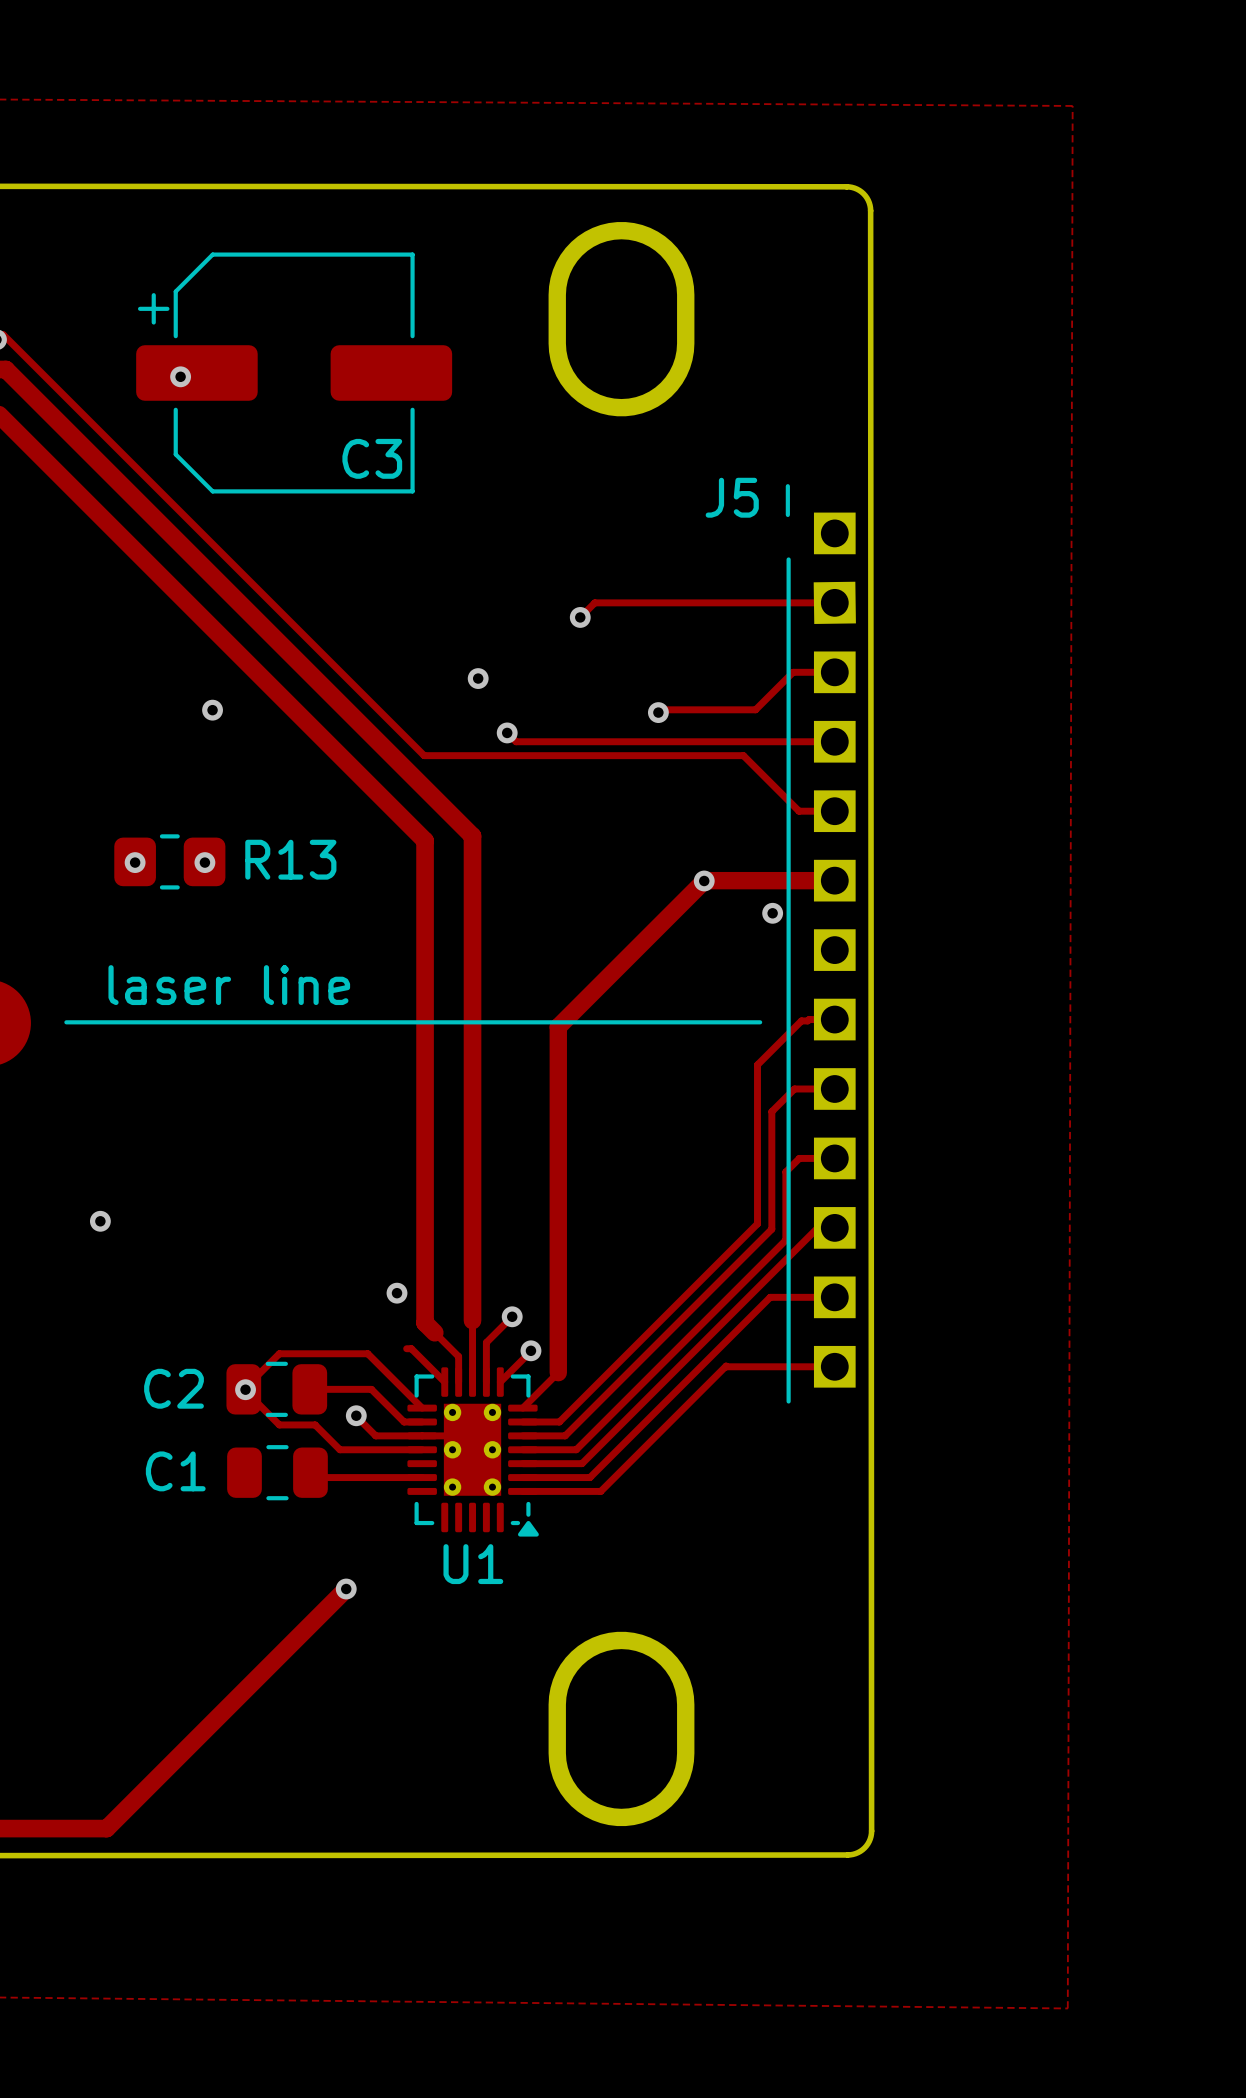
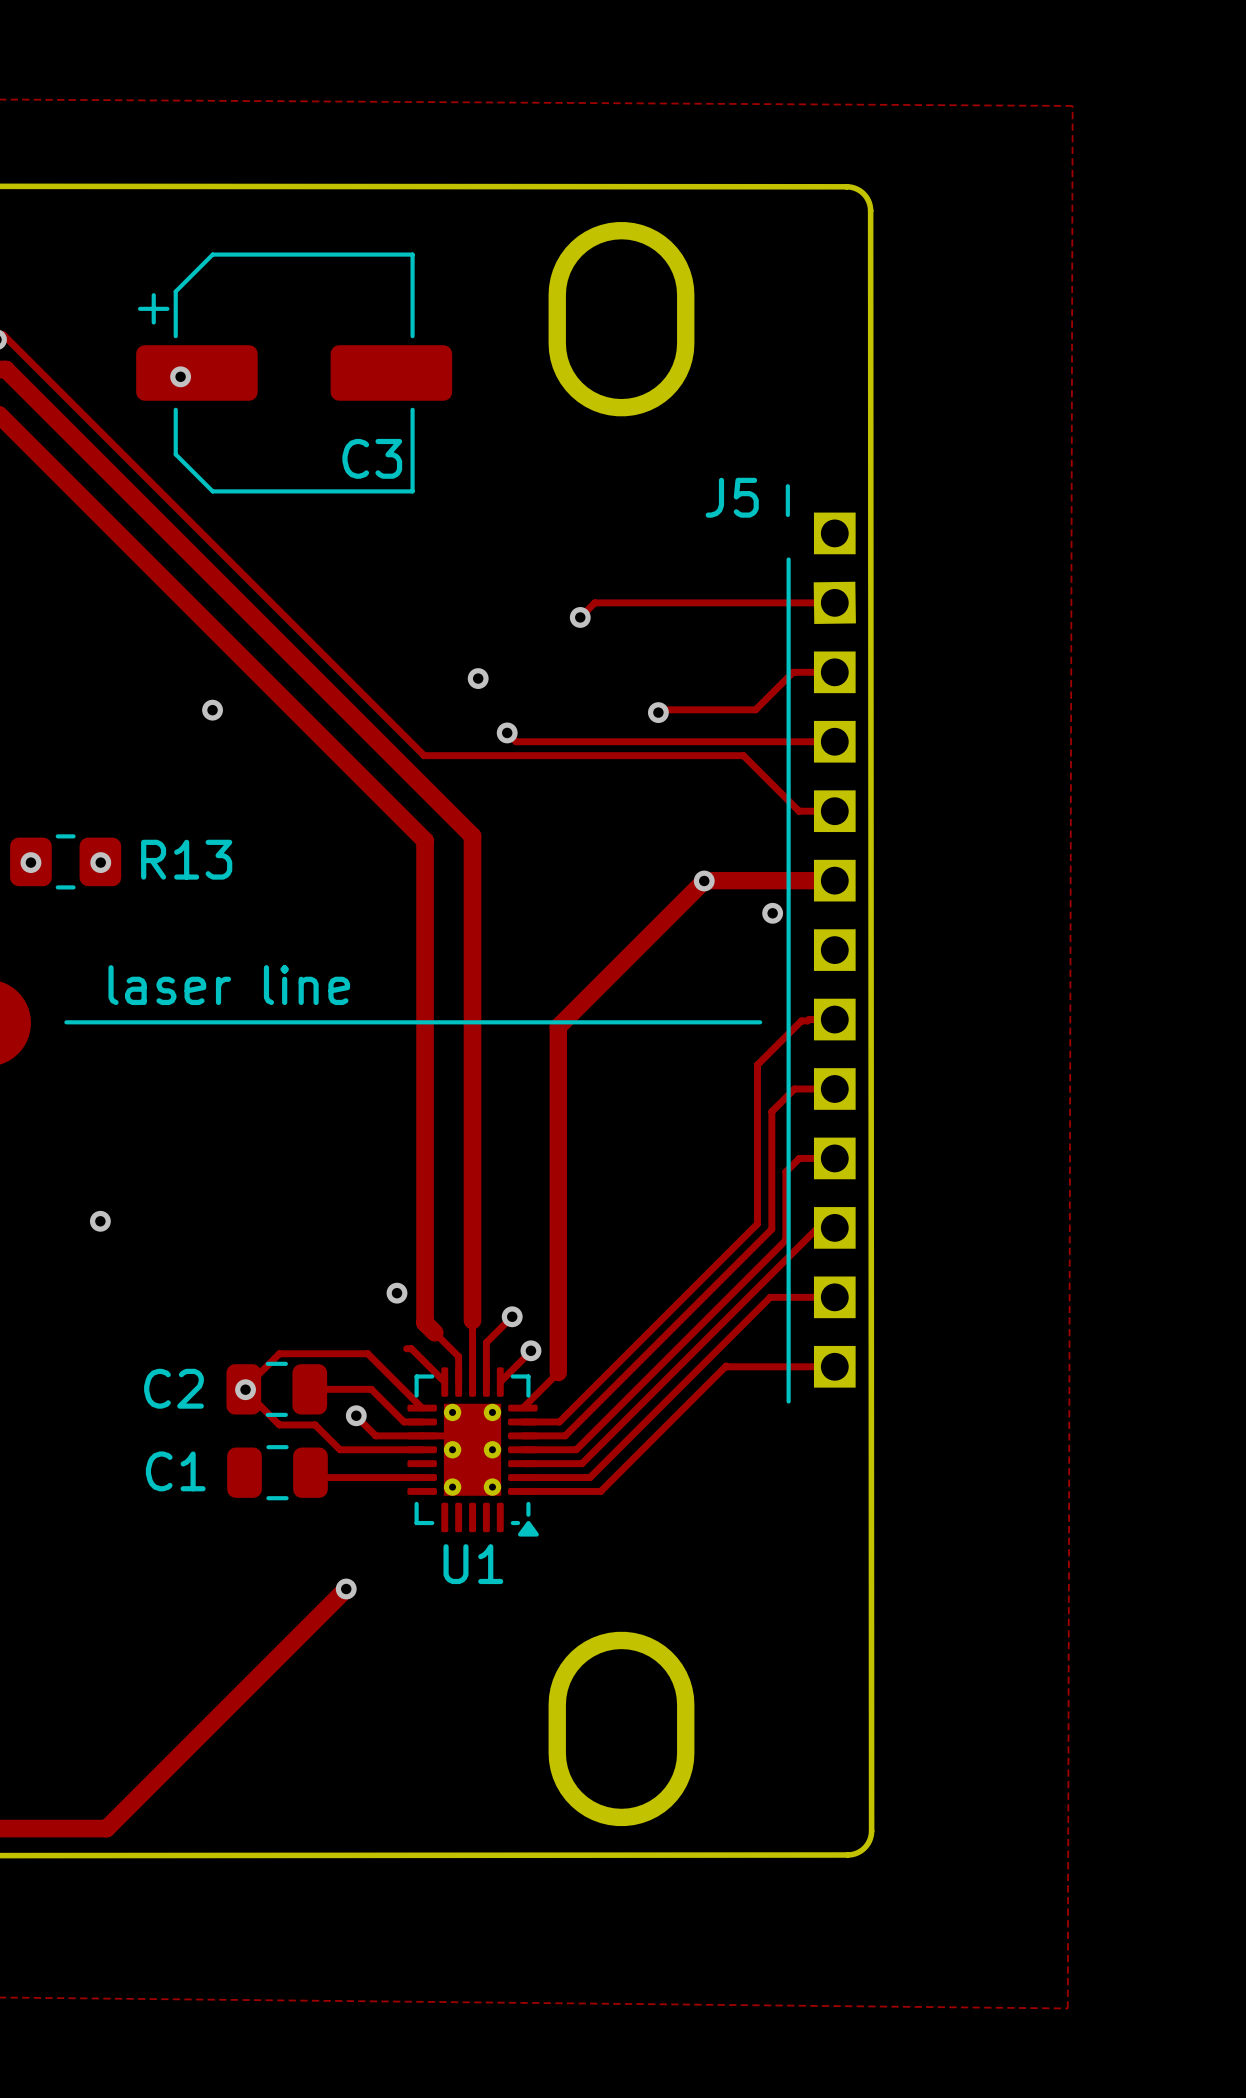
R13 position: (169, 861) -> (65, 861)
via: none -> (30, 862)
via position: (135, 862) -> (100, 862)
via: (204, 862) -> none

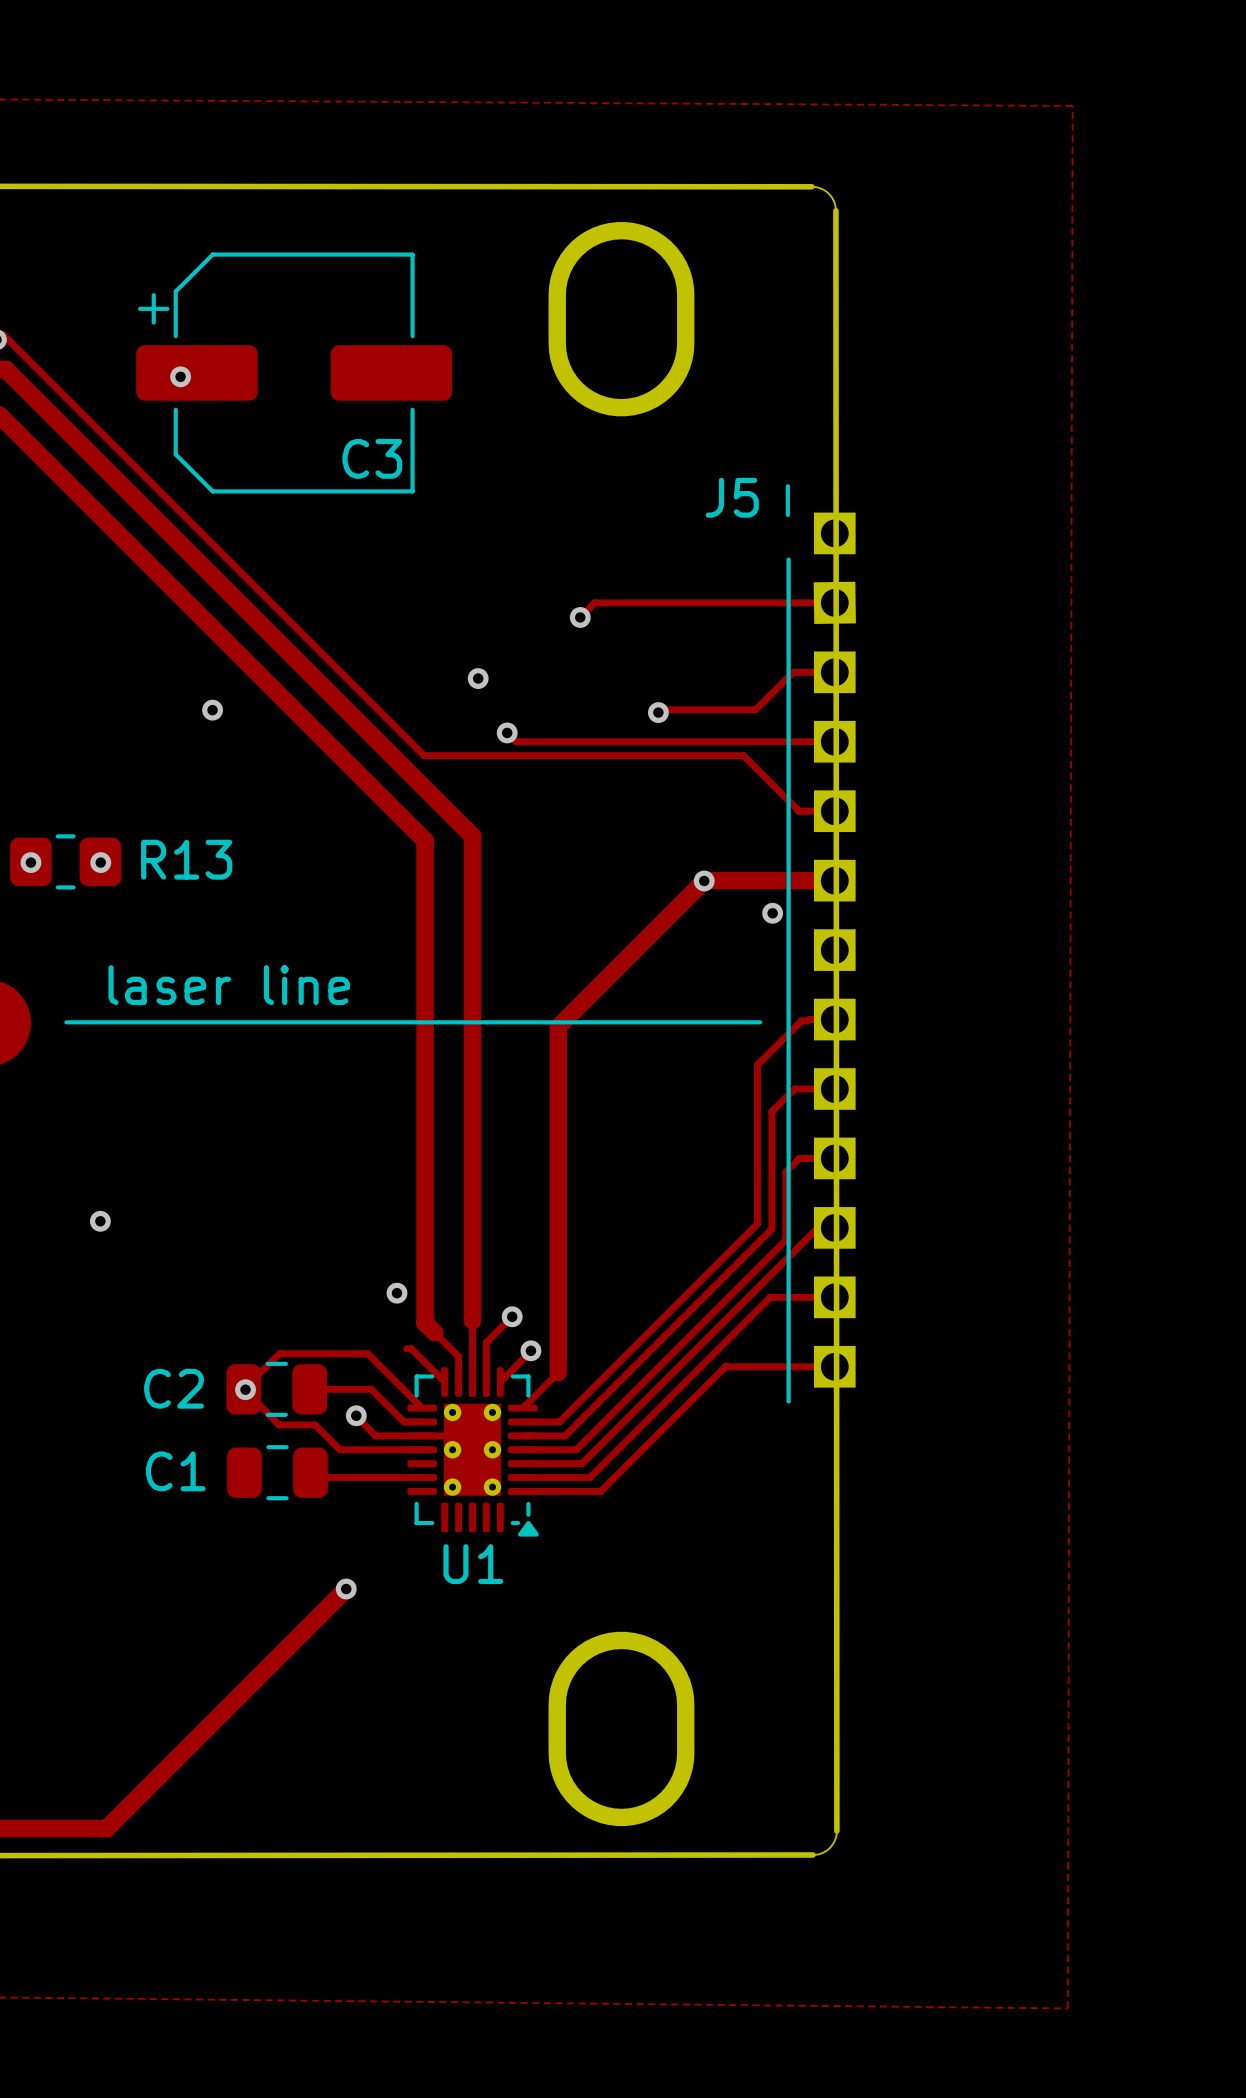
board edge: (811, 186) (854, 188) (866, 198) (870, 210) (871, 1831) (867, 1843) (855, 1853) (812, 1855) -> (811, 186) (822, 189) (828, 193) (834, 202) (835, 210) (836, 1831) (835, 1838) (829, 1847) (823, 1852) (812, 1855)

